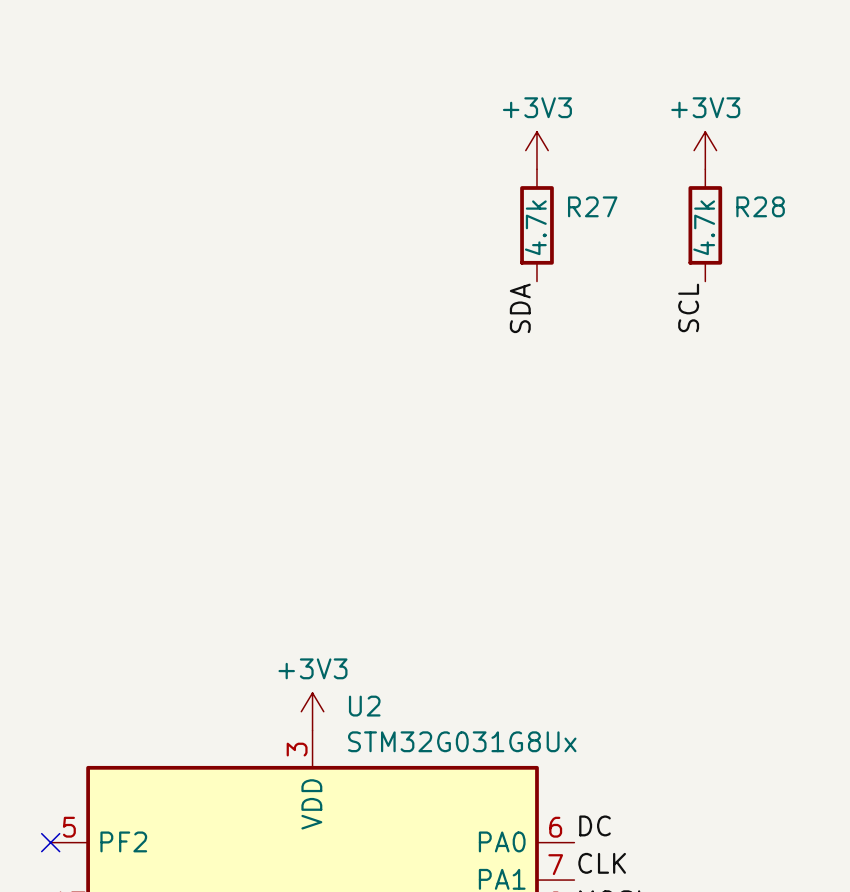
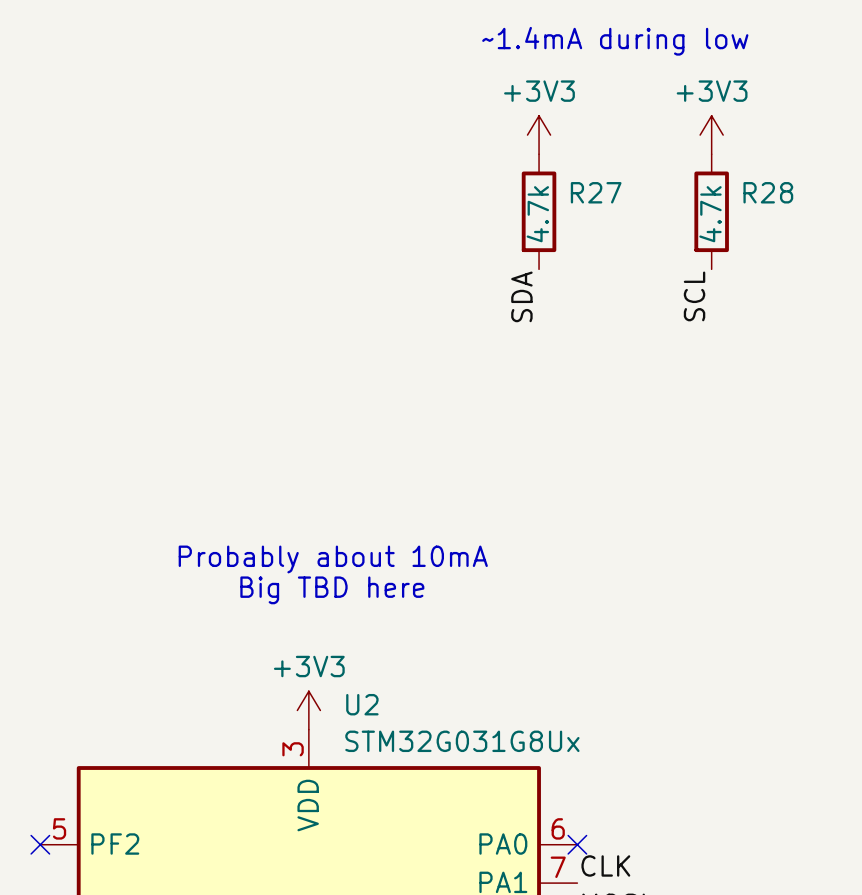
text: none -> ~1.4mA during low (615, 41)
text: none -> Probably about 10mA (333, 559)
text: none -> Big TBD here (332, 590)
label: DC (595, 825) -> none
no-connect mark: none -> (577, 844)

